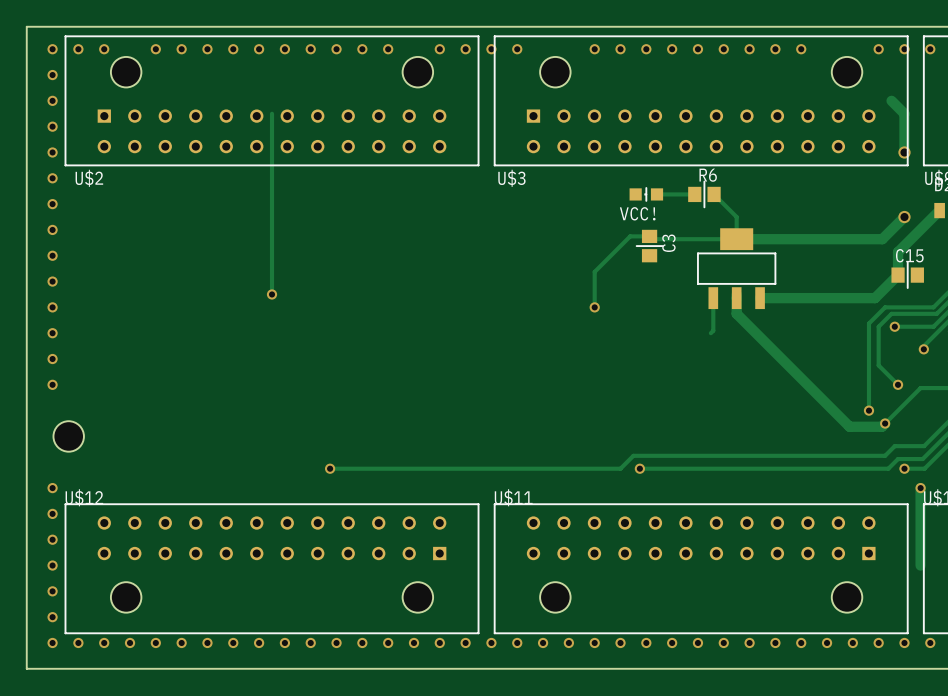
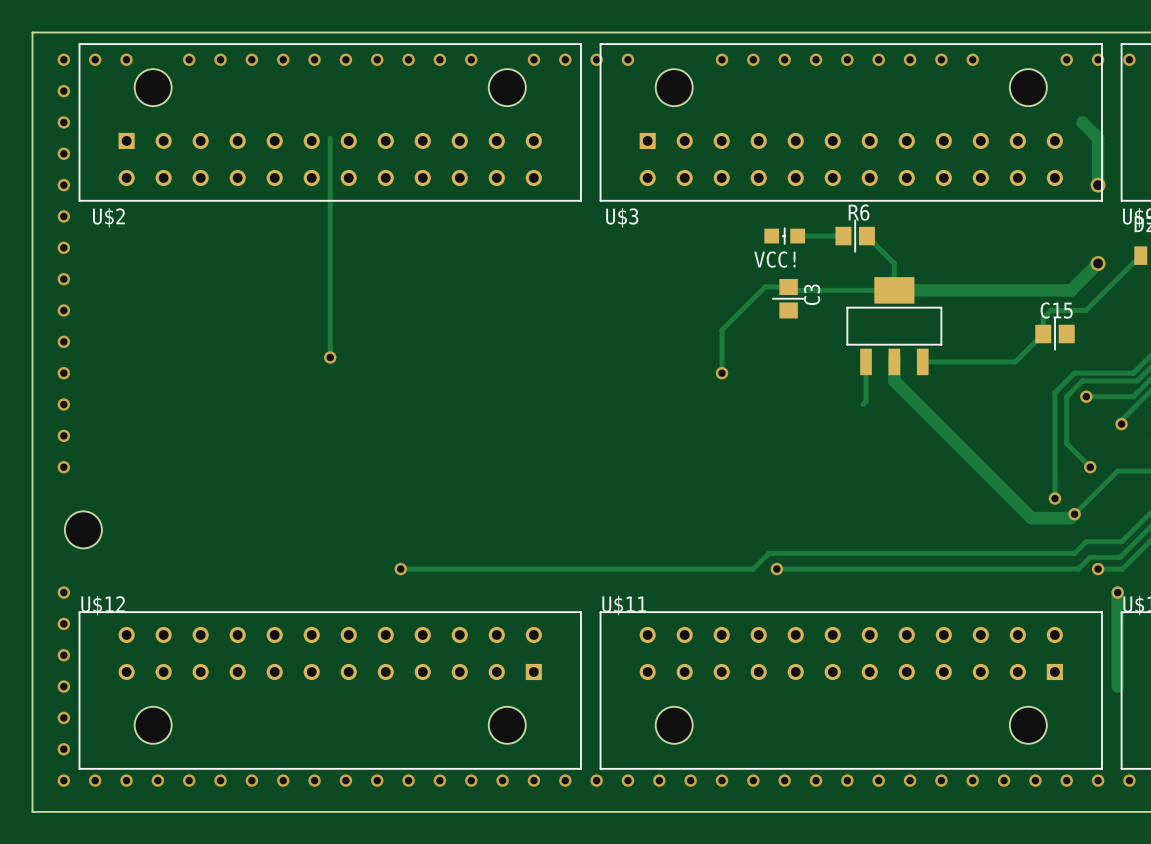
track width: thick (939, 210) (898, 252) -> thin (1140, 255) (1090, 306)
track: (898, 252) (898, 275) (875, 298) (836, 298) -> (1090, 306) (1085, 310) (1051, 310) (1043, 318) (1043, 333) (1015, 361)
C15 position: (907, 275) -> (1054, 333)
track width: thick (760, 298) (836, 298) -> thin (922, 361) (1015, 361)

